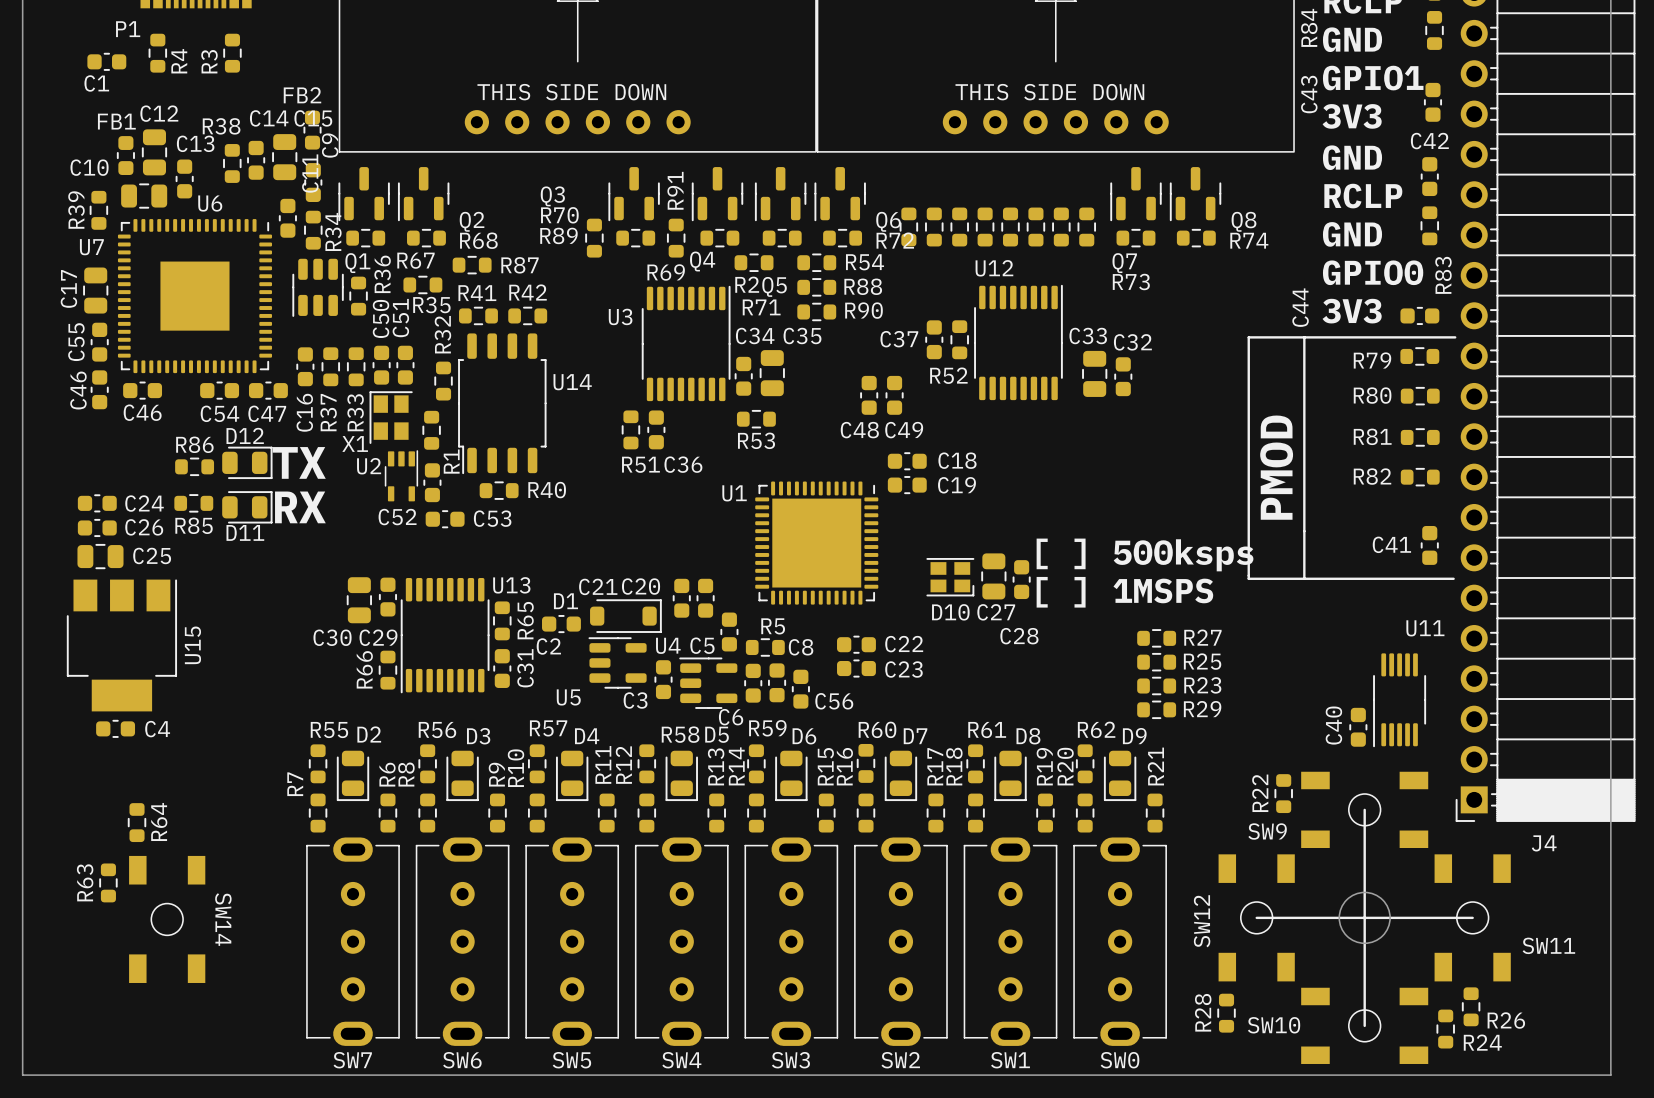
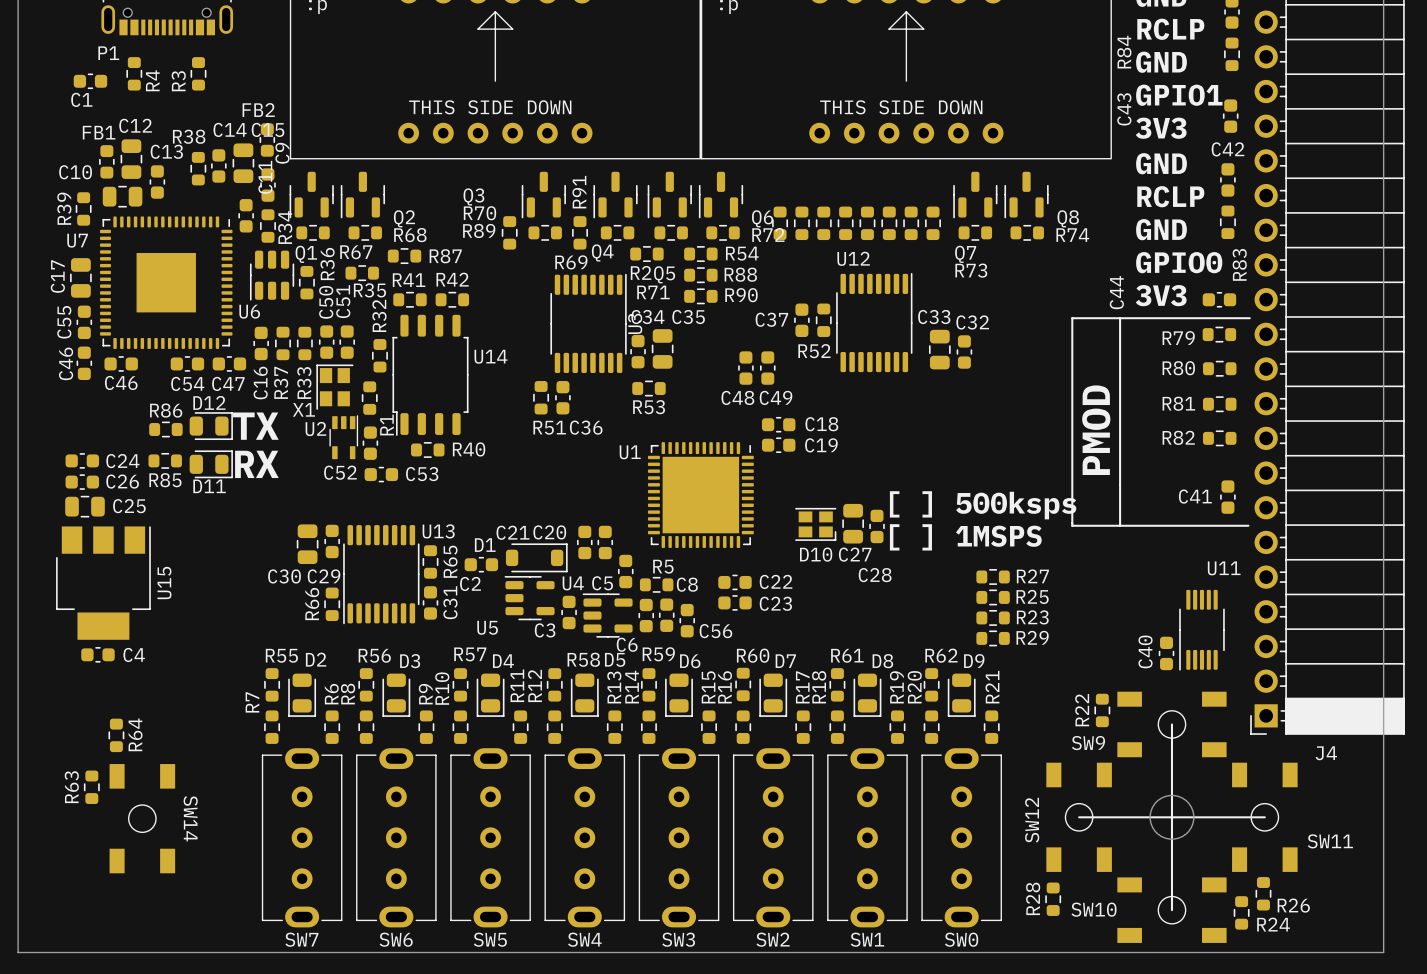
U6 name position: U6 (210, 203) -> U6 (249, 311)
U3 name rotation: 0° (620, 316) -> 90° counterclockwise (635, 323)
U3 name position: U3 (620, 316) -> U3 (635, 323)

